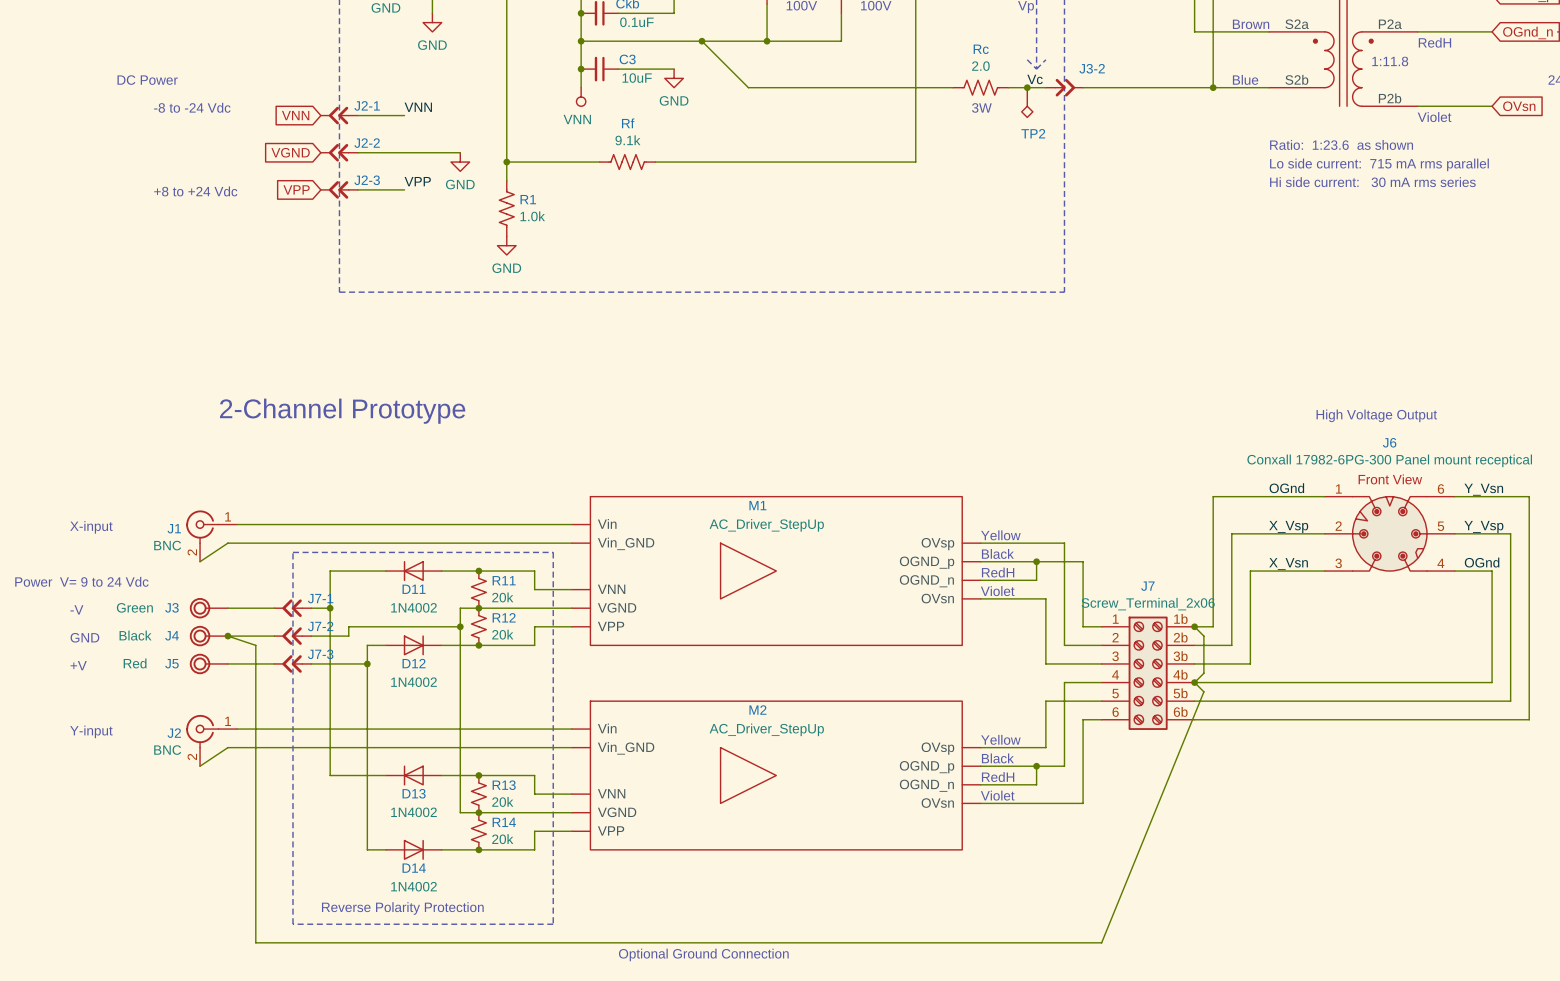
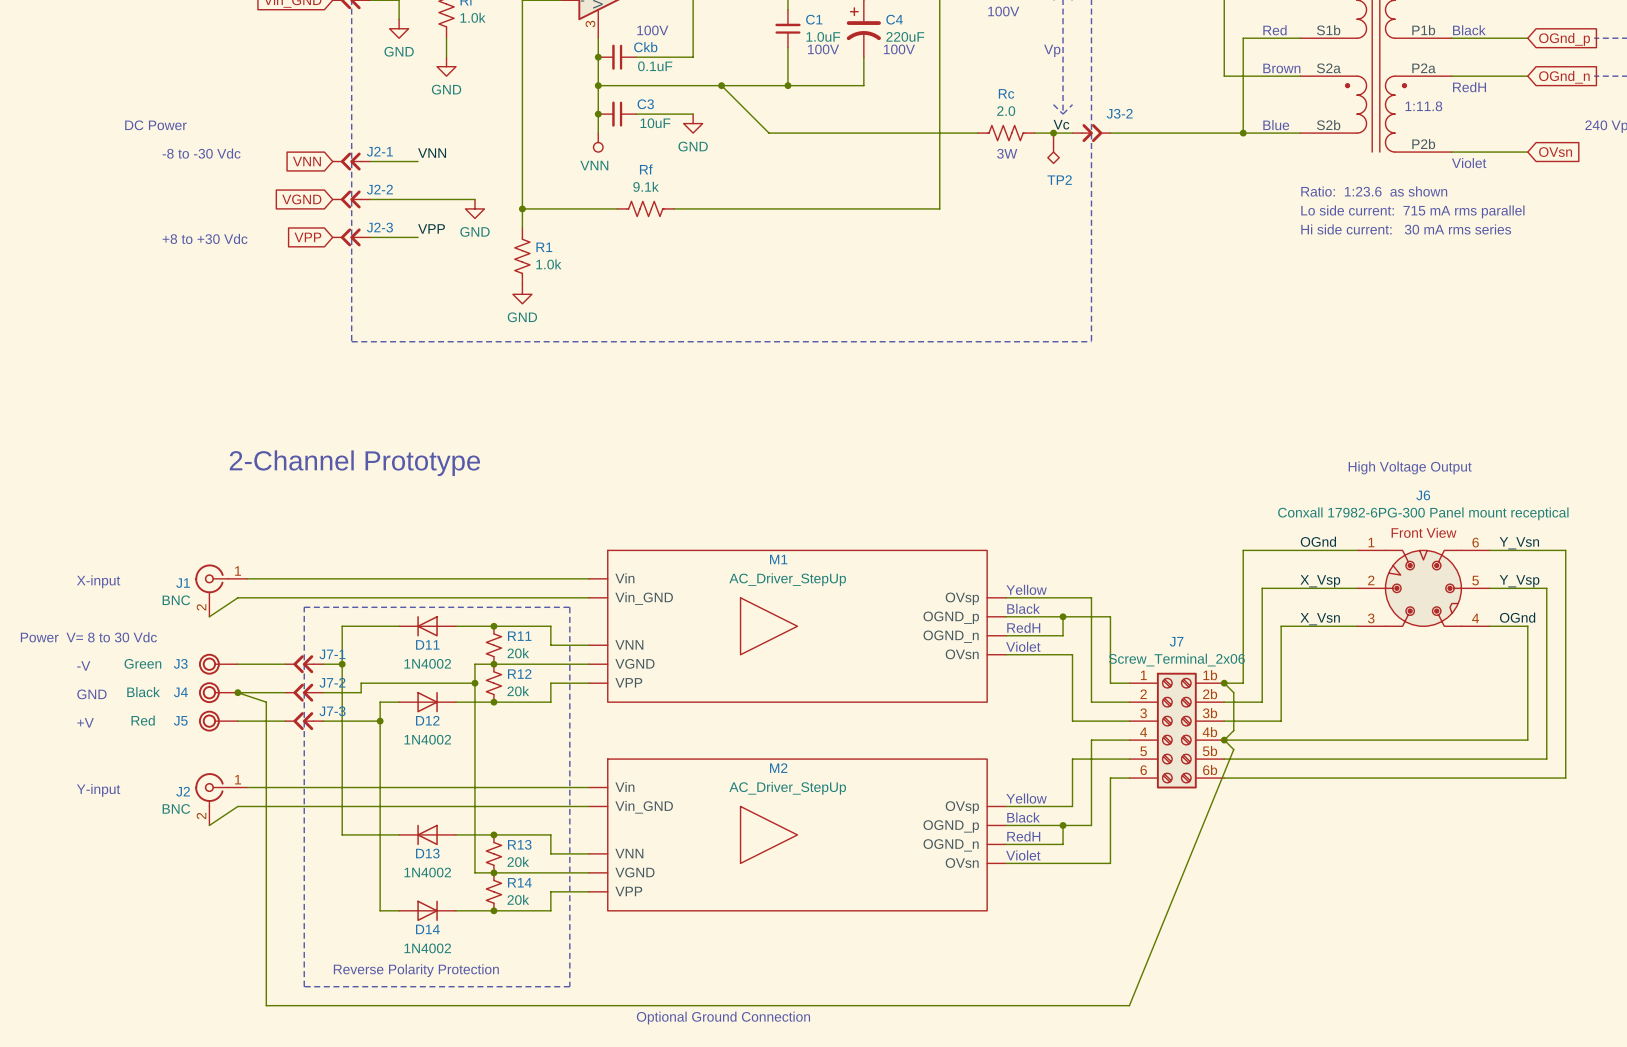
text: -8 to -24 Vdc (192, 107) -> -8 to -30 Vdc (201, 153)
text: +8 to +24 Vdc (195, 191) -> +8 to +30 Vdc (205, 238)
text: Power V= 9 to 24 Vdc (81, 581) -> Power V= 8 to 30 Vdc (88, 637)

